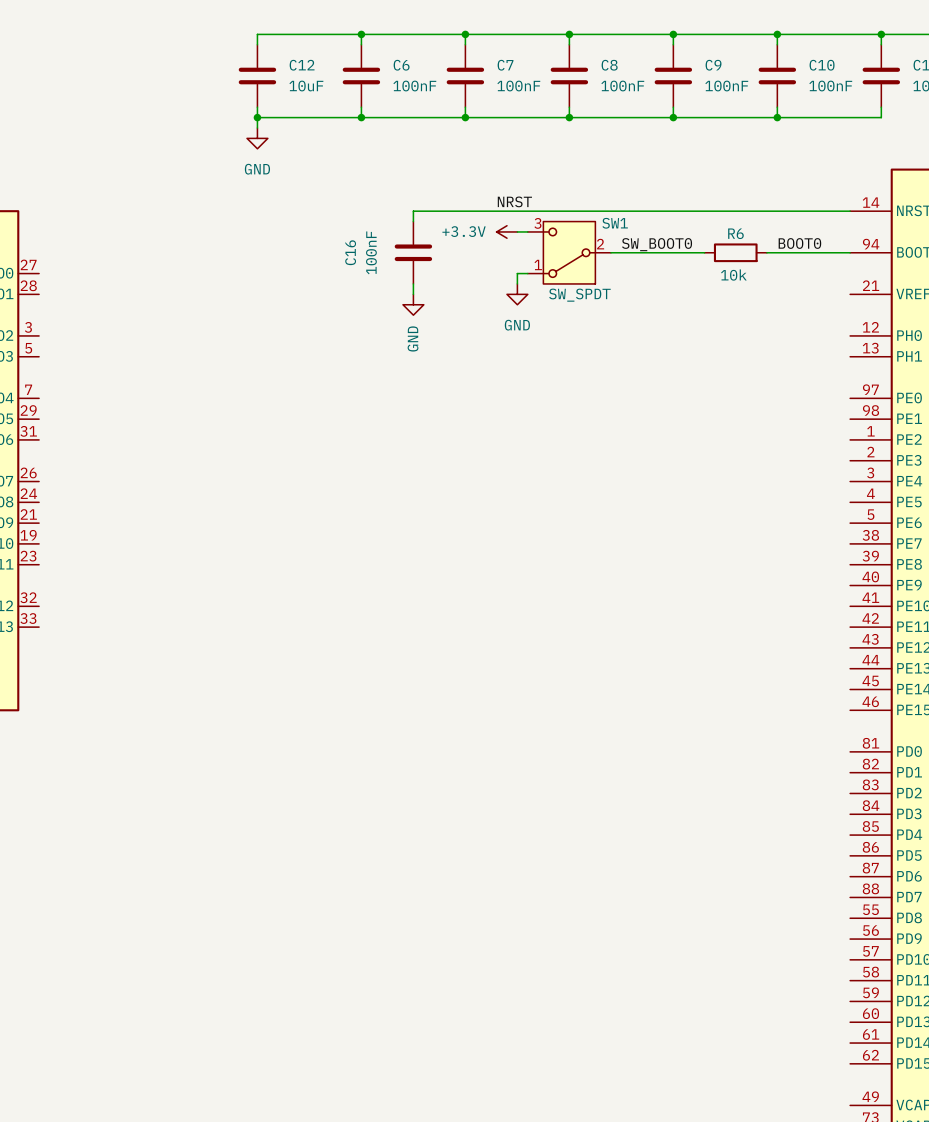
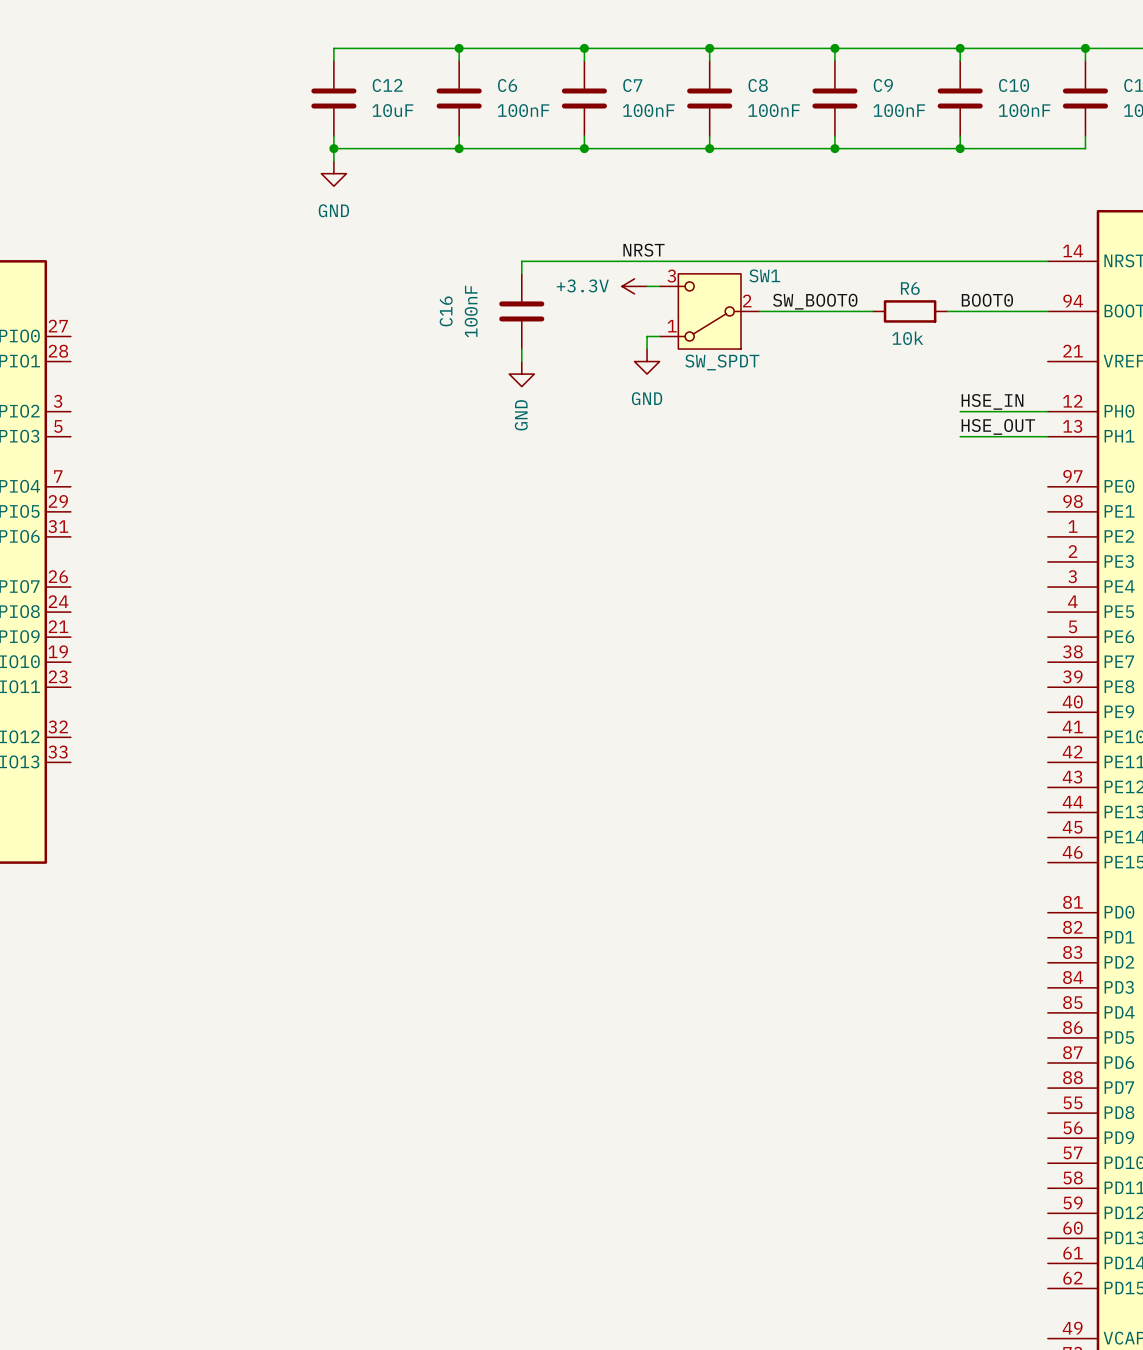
label: none -> HSE_IN (992, 401)
wire: none -> (960, 411) (1047, 411)
label: none -> HSE_OUT (998, 426)
wire: none -> (960, 436) (1047, 436)

